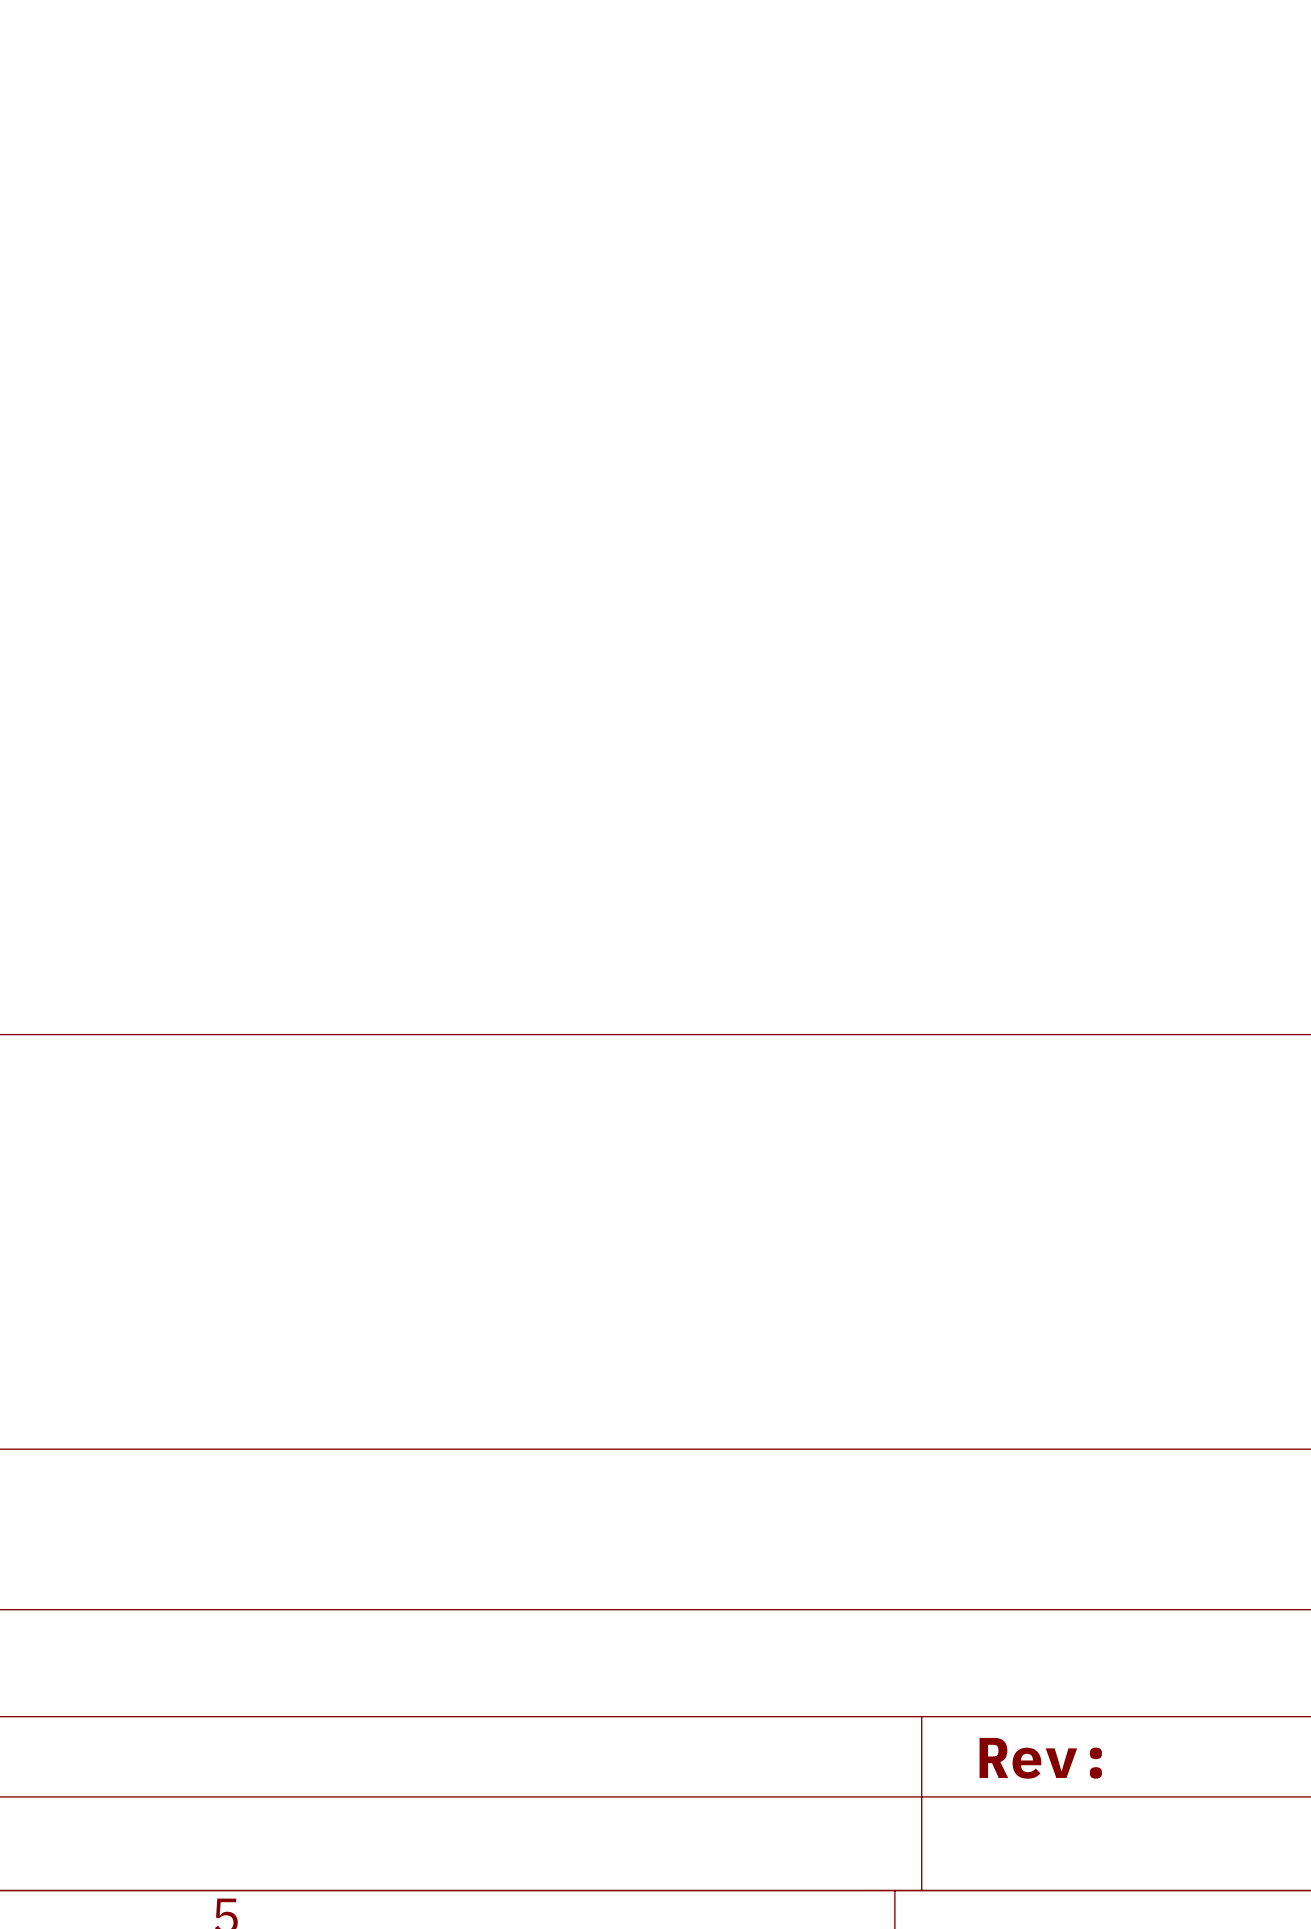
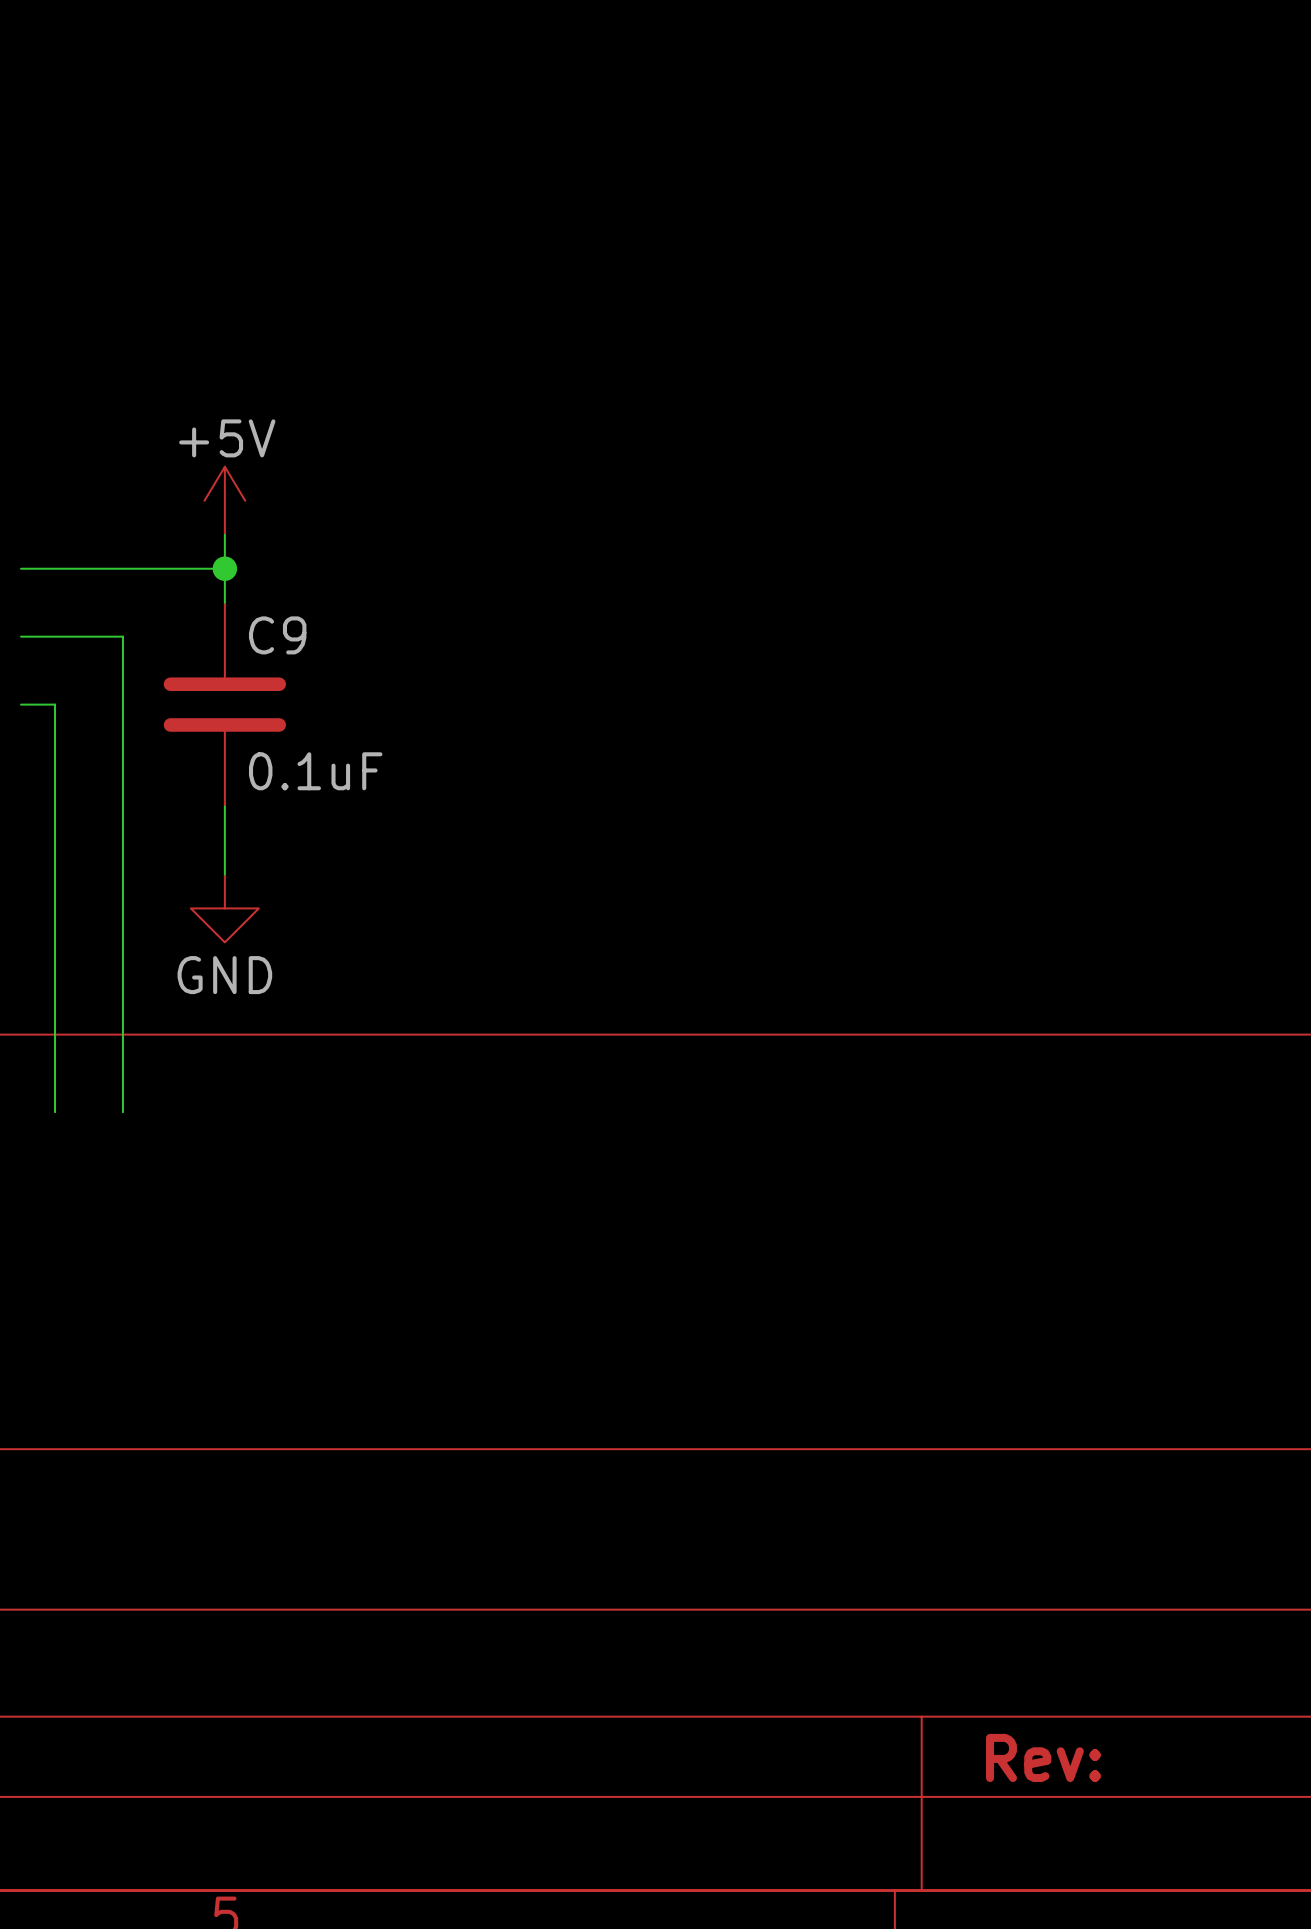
power symbol: none -> +5V (224, 500)
wire: none -> (224, 534) (224, 602)
wire: none -> (21, 568) (224, 568)
junction: none -> (224, 568)
wire: none -> (21, 636) (122, 636) (122, 1112)
wire: none -> (21, 704) (55, 704) (55, 1112)
C9: none -> 0.1uF (224, 704)
wire: none -> (224, 806) (224, 874)
power symbol: none -> GND (224, 908)

